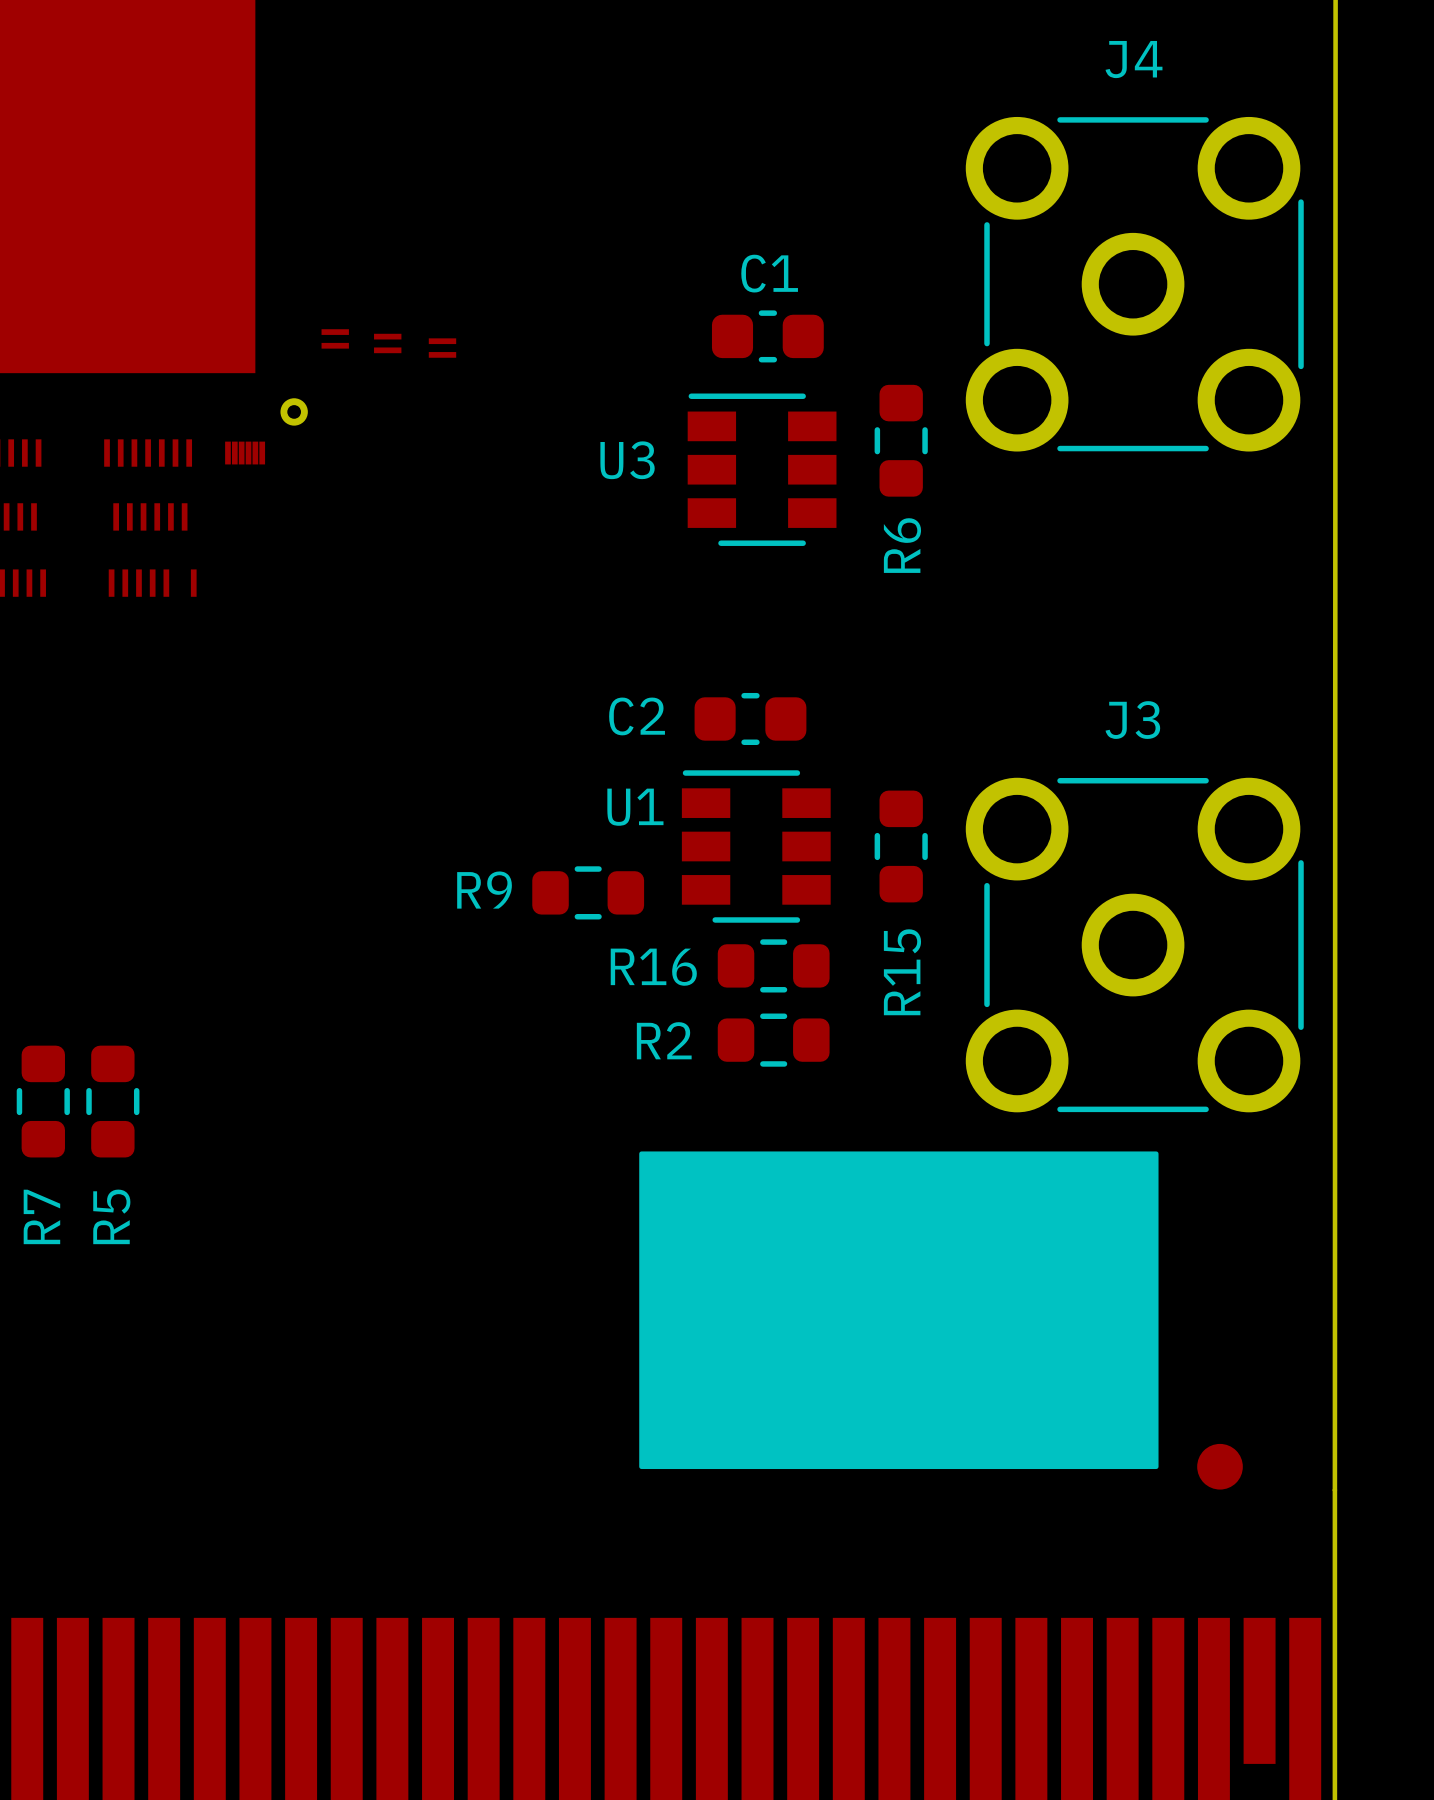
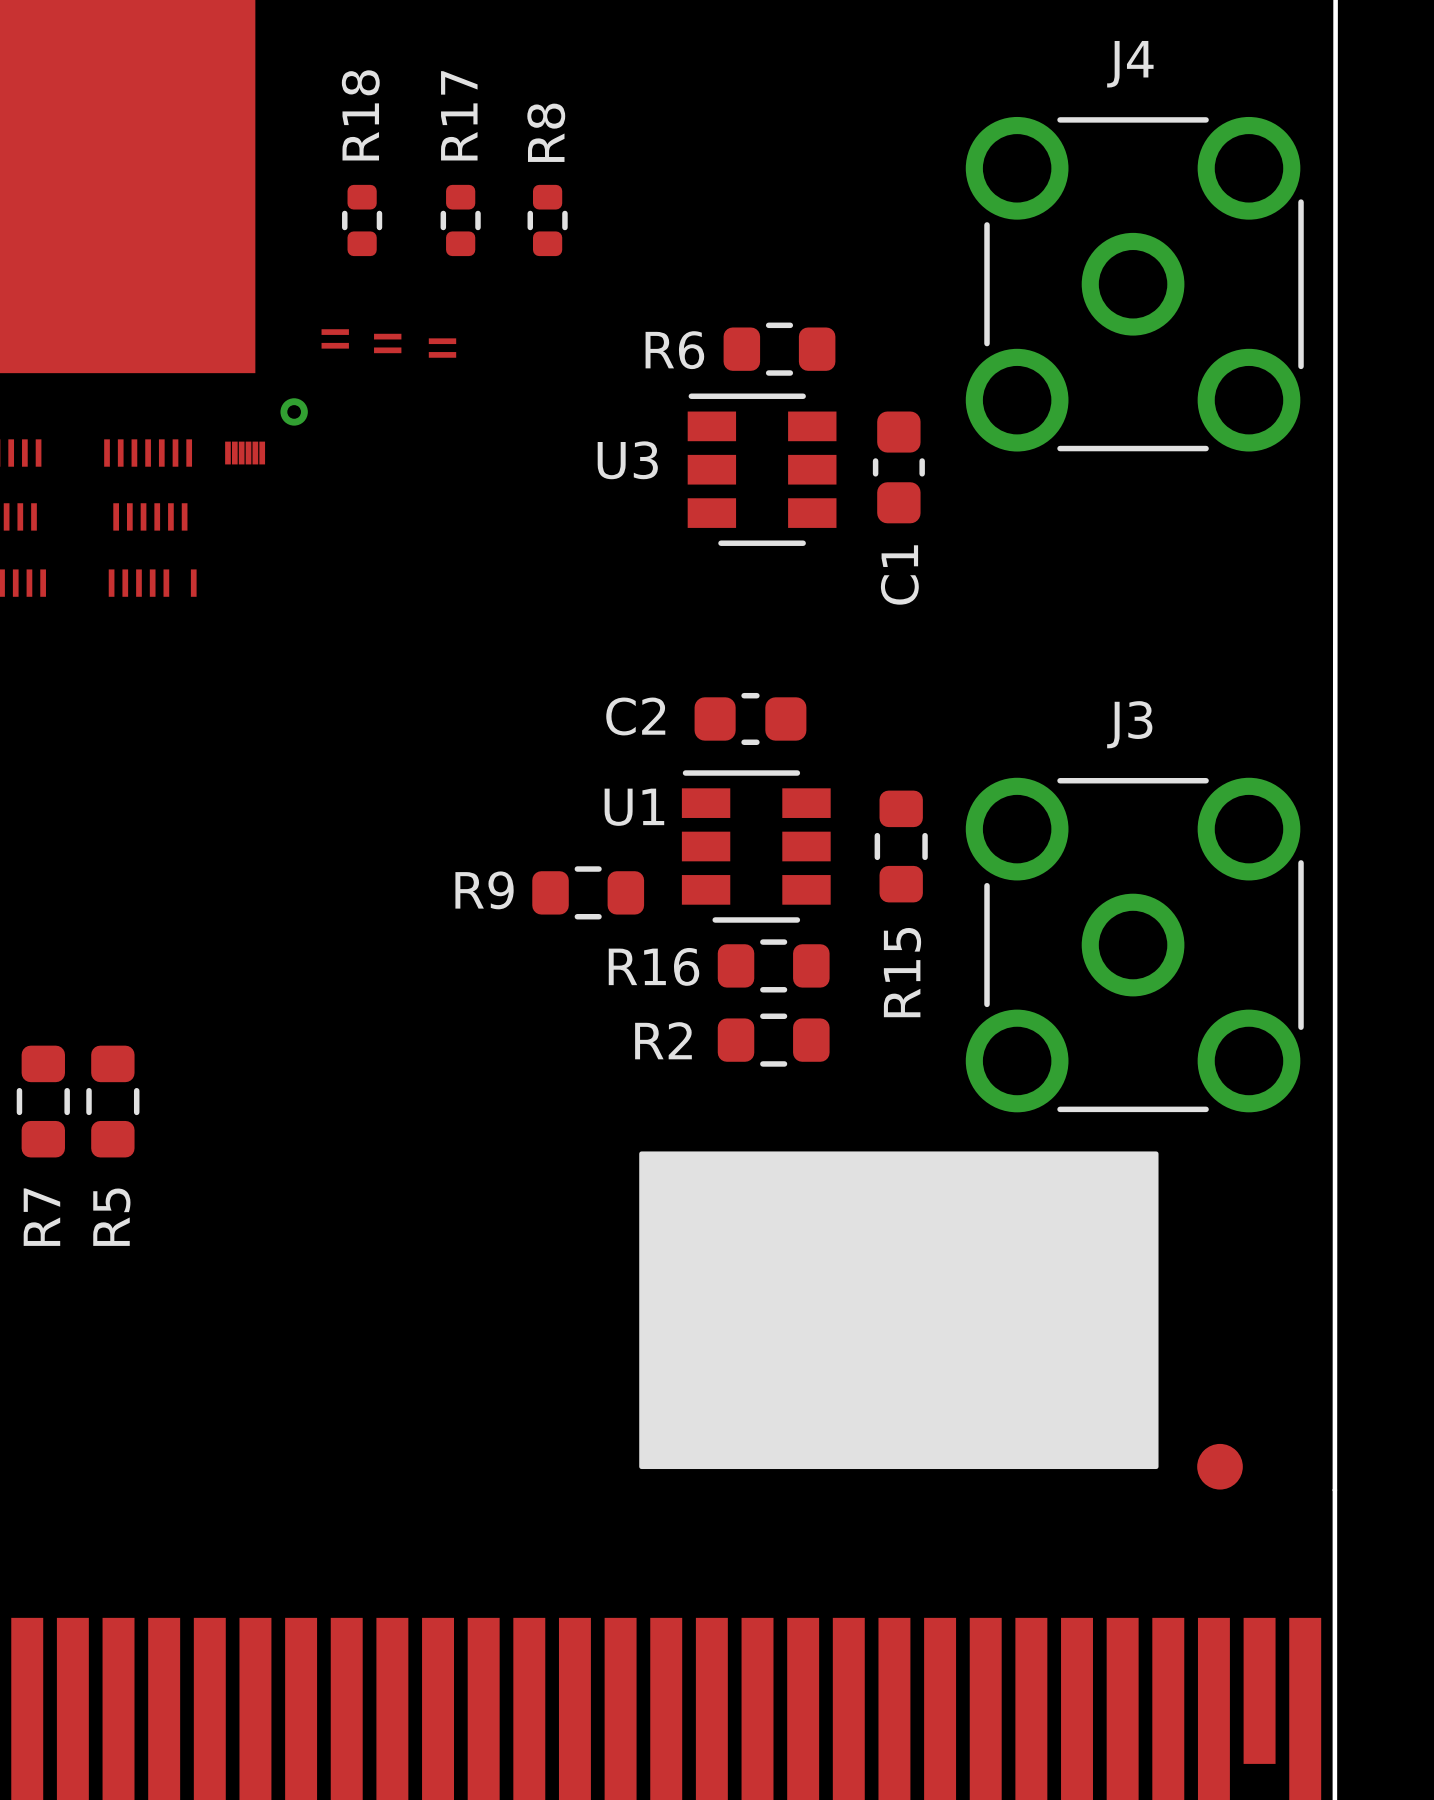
R18: none -> (362, 220)
R17: none -> (460, 220)
R8: none -> (547, 220)
C1 name position: C1 (769, 273) -> C1 (899, 574)
C1 rotation: 0° (767, 336) -> 90° clockwise (898, 467)
C1 position: (767, 336) -> (898, 467)
R6 rotation: 0° (901, 440) -> 90° clockwise (779, 349)
R6 position: (901, 440) -> (779, 349)

